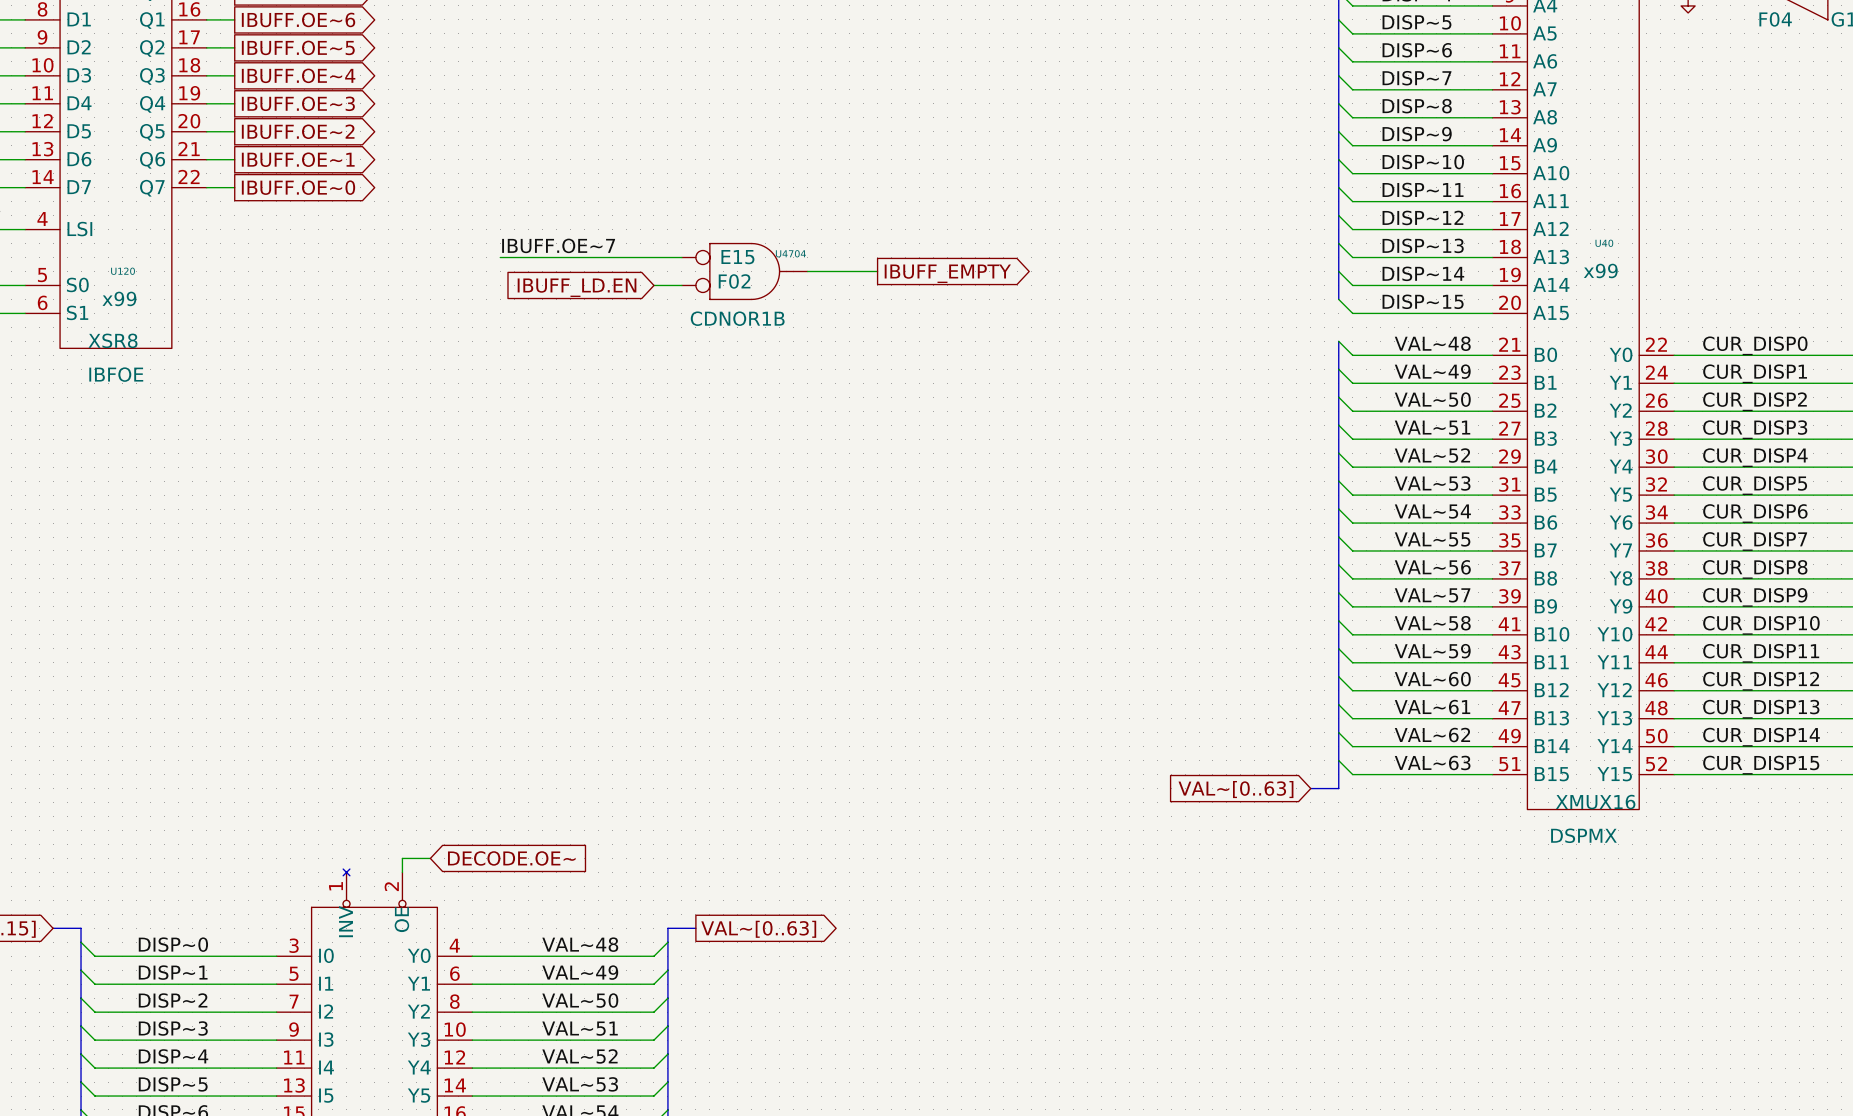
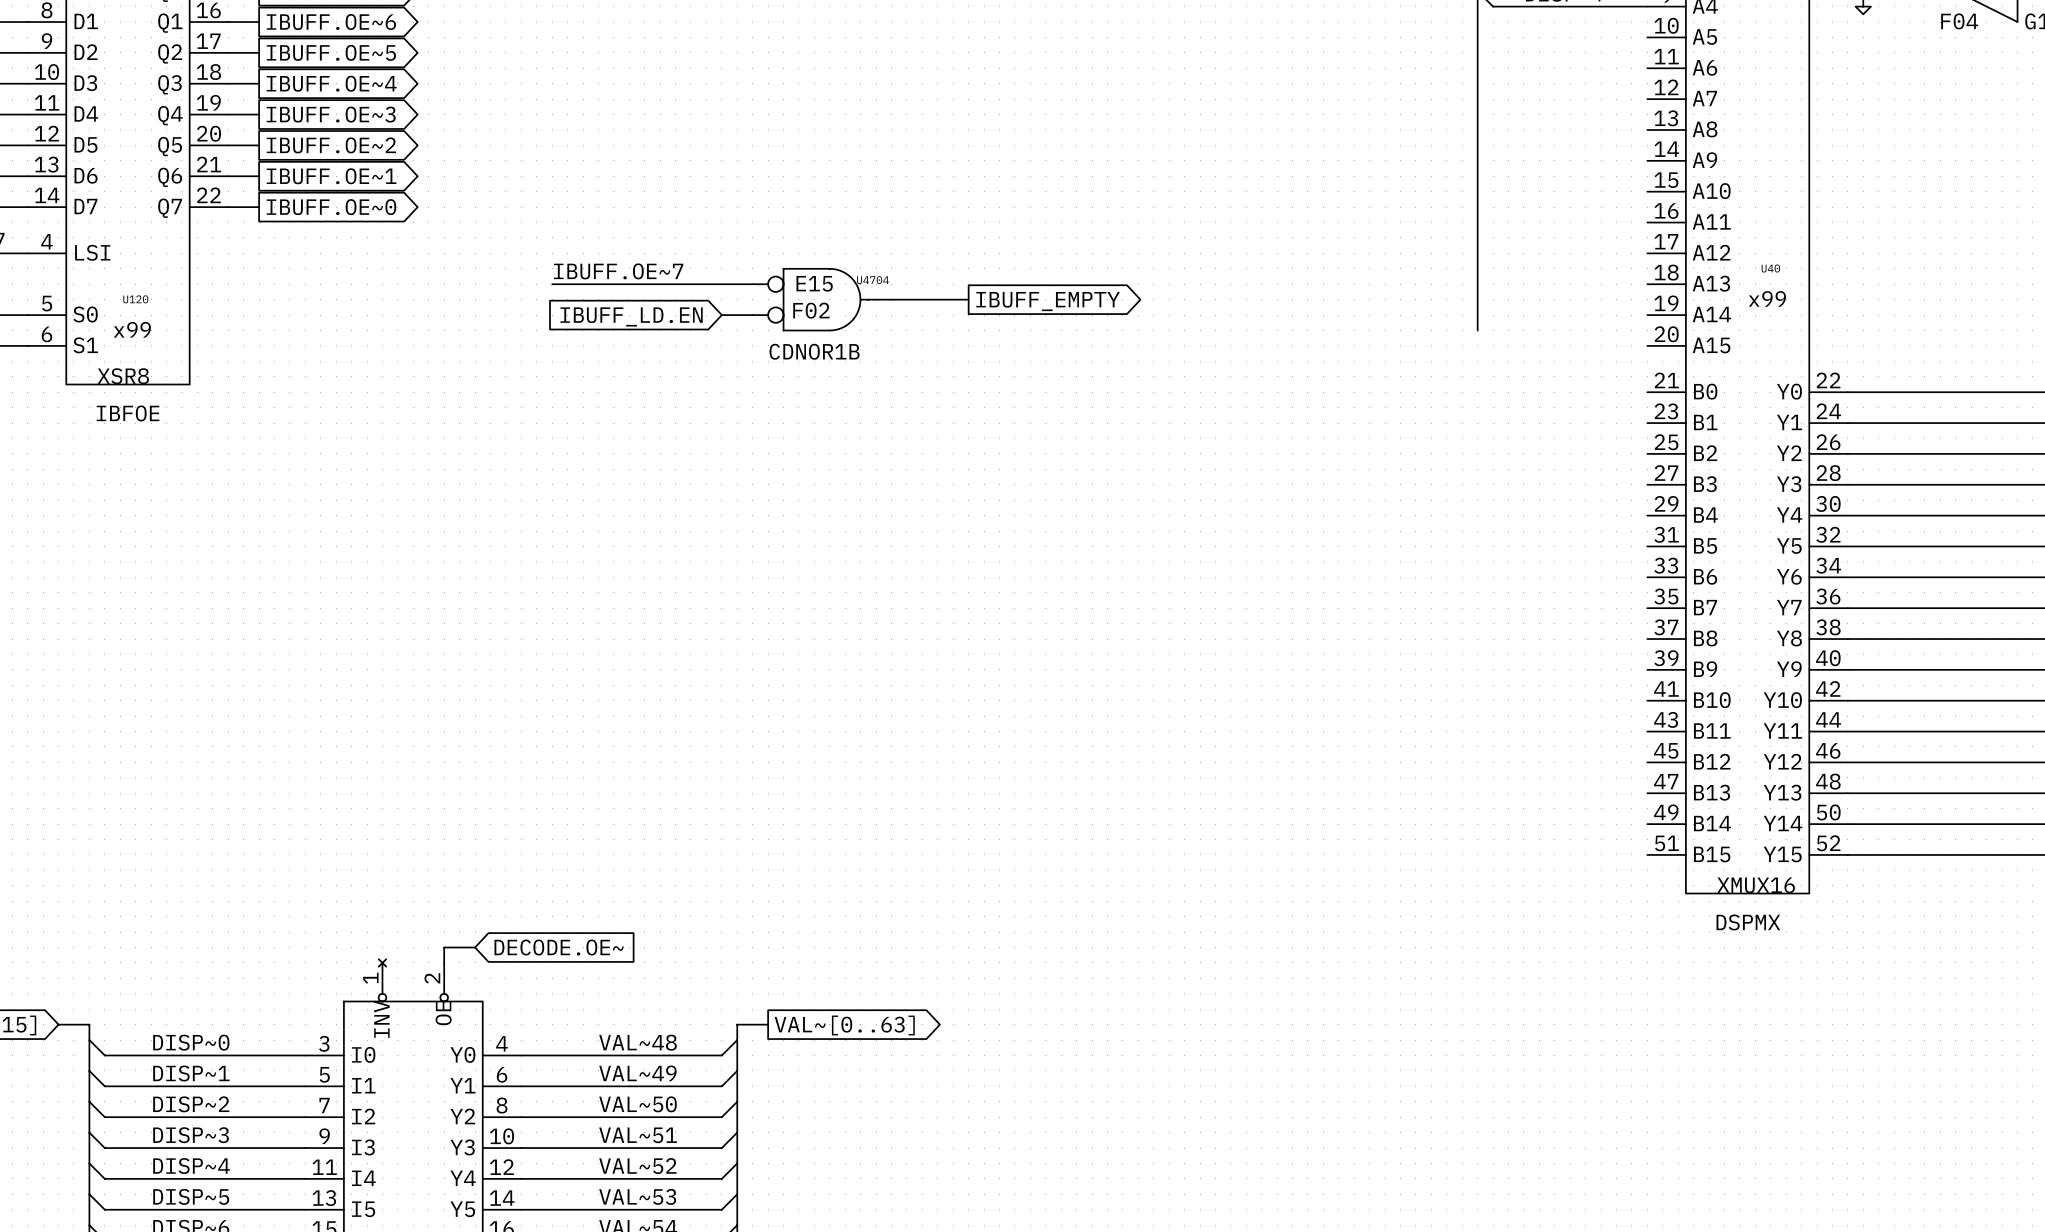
wire: (1338, 19) (1352, 33) (1492, 33) -> none
label: DISP~5 (1416, 22) -> none
wire: (1338, 47) (1352, 61) (1492, 61) -> none
label: DISP~6 (1417, 50) -> none
wire: (1338, 75) (1352, 89) (1492, 89) -> none
label: DISP~7 (1416, 78) -> none
wire: (1338, 103) (1352, 117) (1492, 117) -> none
label: DISP~8 (1417, 106) -> none
wire: (1338, 131) (1352, 145) (1492, 145) -> none
label: DISP~9 (1417, 134) -> none
wire: (1338, 159) (1352, 173) (1492, 173) -> none
label: DISP~10 (1423, 162) -> none
wire: (1338, 187) (1352, 201) (1492, 201) -> none
label: DISP~11 (1423, 189) -> none
wire: (1338, 215) (1352, 229) (1492, 229) -> none
label: DISP~12 (1422, 217) -> none
wire: (1338, 243) (1352, 257) (1492, 257) -> none
label: DISP~13 (1423, 245) -> none
wire: (1338, 271) (1352, 285) (1492, 285) -> none
label: DISP~14 (1423, 273) -> none
wire: (1338, 299) (1352, 313) (1492, 313) -> none
label: DISP~15 (1423, 301) -> none
wire: (1338, 341) (1352, 355) (1492, 355) -> none
bus: (1338, 341) (1338, 788) (1310, 788) -> none
label: VAL~48 (1432, 343) -> none
label: CUR_DISP0 (1755, 345) -> none
wire: (1338, 369) (1352, 383) (1492, 383) -> none
label: VAL~49 (1432, 371) -> none
label: CUR_DISP1 (1755, 373) -> none
wire: (1338, 397) (1352, 411) (1492, 411) -> none
label: VAL~50 (1432, 399) -> none
label: CUR_DISP2 (1755, 401) -> none
wire: (1338, 425) (1352, 439) (1492, 439) -> none
label: VAL~51 (1432, 427) -> none
label: CUR_DISP3 (1755, 429) -> none
wire: (1338, 453) (1352, 467) (1492, 467) -> none
label: VAL~52 (1432, 455) -> none
label: CUR_DISP4 (1755, 457) -> none
wire: (1338, 481) (1352, 495) (1492, 495) -> none
label: VAL~53 (1432, 483) -> none
label: CUR_DISP5 (1755, 485) -> none
wire: (1338, 509) (1352, 523) (1492, 523) -> none
label: VAL~54 (1432, 511) -> none
label: CUR_DISP6 (1755, 513) -> none
wire: (1338, 537) (1352, 550) (1492, 550) -> none
label: VAL~55 (1432, 539) -> none
label: CUR_DISP7 (1755, 541) -> none
wire: (1338, 564) (1352, 578) (1492, 578) -> none
label: VAL~56 (1432, 567) -> none
label: CUR_DISP8 (1755, 569) -> none
wire: (1338, 592) (1352, 606) (1492, 606) -> none
label: VAL~57 (1432, 595) -> none
label: CUR_DISP9 (1755, 597) -> none
wire: (1338, 620) (1352, 634) (1492, 634) -> none
label: VAL~58 (1432, 623) -> none
label: CUR_DISP10 (1761, 625) -> none
wire: (1338, 648) (1352, 662) (1492, 662) -> none
label: VAL~59 (1432, 651) -> none
label: CUR_DISP11 (1761, 653) -> none
wire: (1338, 676) (1352, 690) (1492, 690) -> none
label: VAL~60 (1432, 679) -> none
label: CUR_DISP12 (1761, 681) -> none
wire: (1338, 704) (1352, 718) (1492, 718) -> none
label: VAL~61 (1432, 707) -> none
label: CUR_DISP13 (1761, 709) -> none
wire: (1338, 732) (1352, 746) (1492, 746) -> none
label: VAL~62 (1432, 735) -> none
label: CUR_DISP14 (1761, 737) -> none
wire: (1338, 760) (1352, 774) (1492, 774) -> none
label: VAL~63 (1432, 762) -> none
label: CUR_DISP15 (1761, 765) -> none
global label: VAL~[0..63] (1235, 789) -> none

